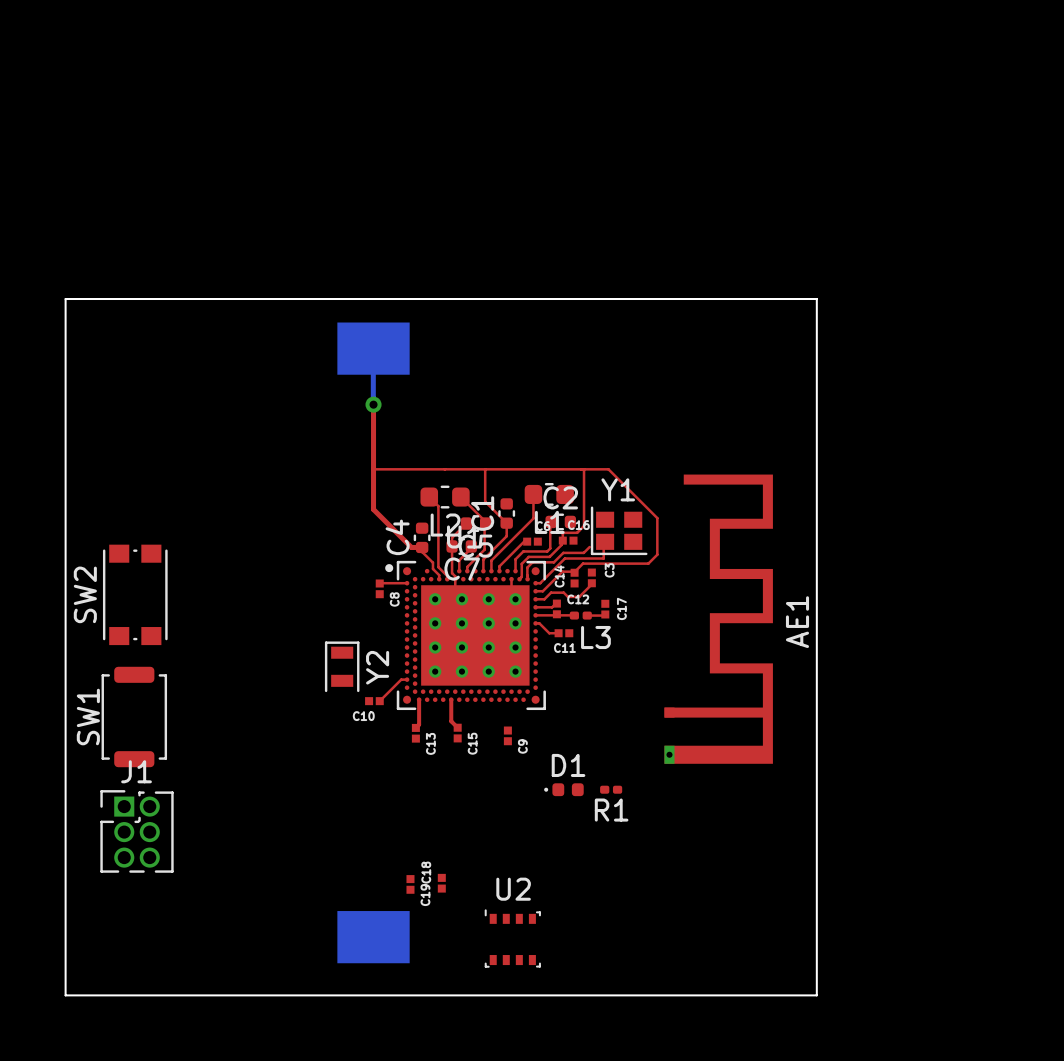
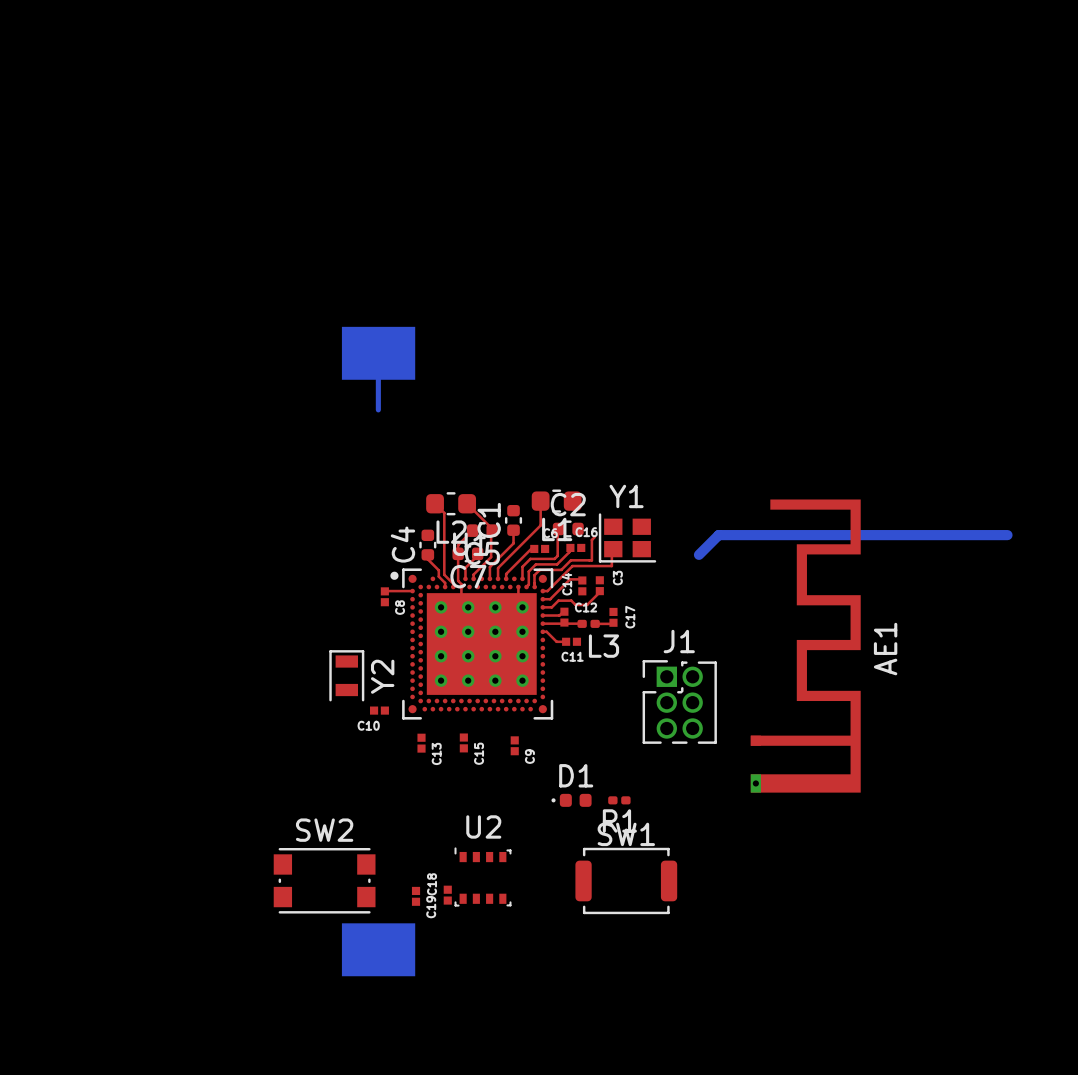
board edge: (65, 299) (816, 299) (816, 995) (65, 995) (65, 299) -> none
top track: (373, 404) (373, 509) (411, 547) (422, 547) -> none
via: (373, 404) -> none
top track: (373, 469) (608, 469) (657, 518) (657, 554) (648, 563) (583, 563) (574, 572) -> none
top track: (485, 469) (485, 501) (506, 523) -> none
top track: (584, 469) (584, 525) (577, 532) (563, 532) (562, 540) -> none
bottom track: none -> (1007, 535) (718, 535) (698, 554)
top track: (589, 547) (583, 552) -> (594, 537) (591, 539) (591, 560)
SW2 rotation: 0° (135, 594) -> 90° clockwise (324, 880)
SW2 position: (135, 594) -> (324, 880)
AE1 position: (718, 619) -> (805, 646)
top track: (407, 679) (401, 679) (379, 701) -> none
top track: (419, 699) (419, 724) (415, 727) -> none
top track: (451, 699) (451, 721) (457, 727) -> none
SW1 rotation: 0° (134, 716) -> 90° clockwise (626, 880)
SW1 position: (134, 716) -> (626, 880)
J1 position: (137, 831) -> (679, 701)
U2 position: (512, 938) -> (482, 877)

